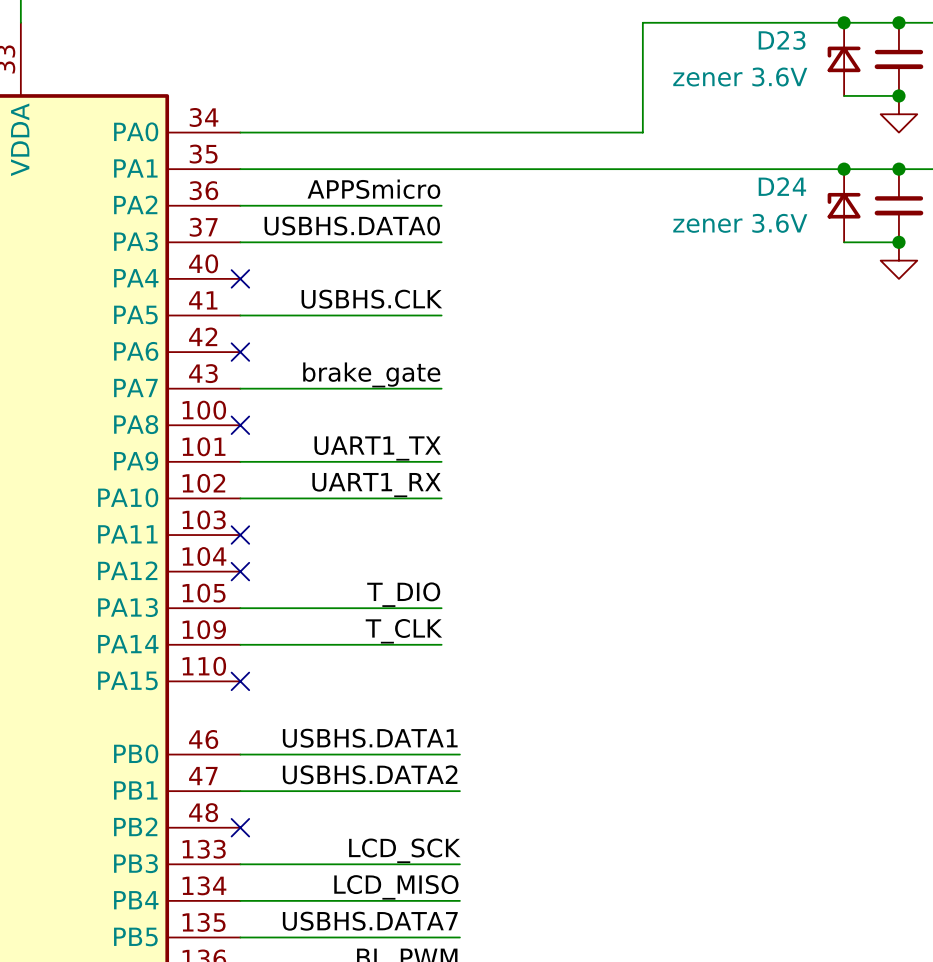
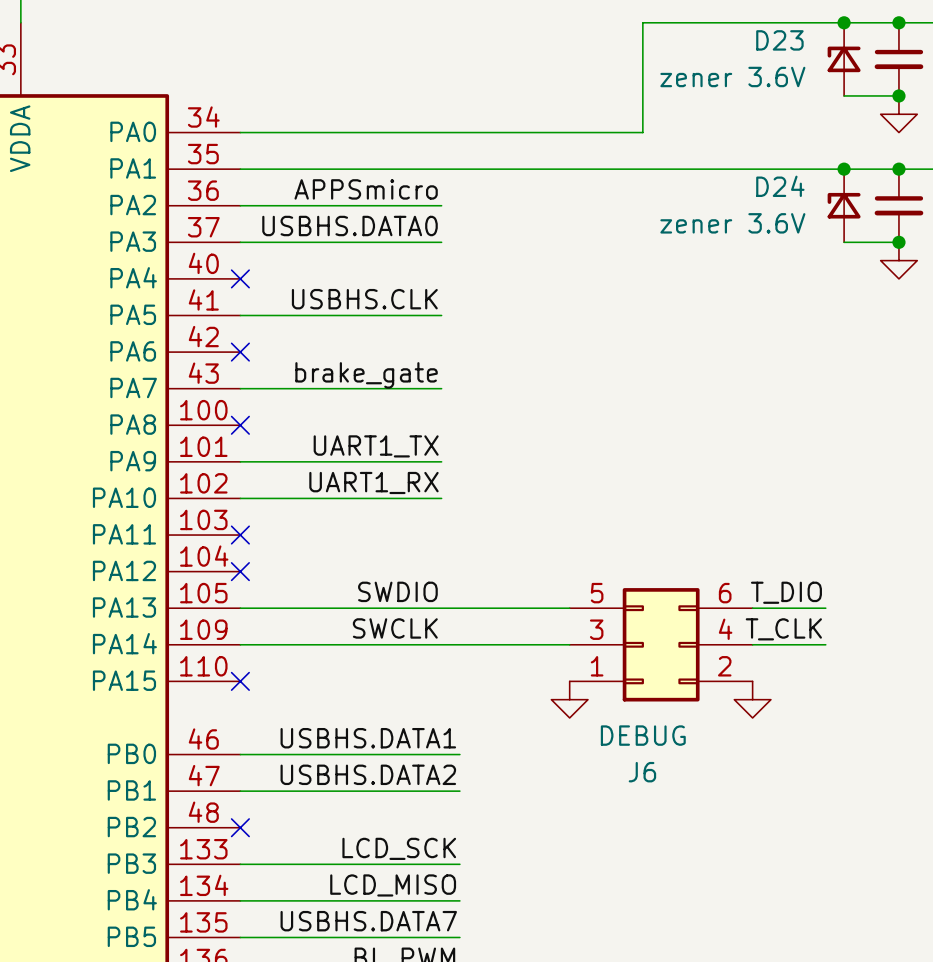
label: T_DIO (403, 594) -> SWDIO (397, 591)
label: none -> T_DIO (786, 592)
wire: none -> (441, 608) (569, 608)
wire: none -> (752, 608) (825, 608)
label: T_CLK (403, 631) -> SWCLK (395, 628)
label: none -> T_CLK (783, 629)
wire: none -> (441, 644) (569, 644)
J6: none -> DEBUG (661, 644)
wire: none -> (752, 644) (825, 644)
power symbol: none -> (569, 699)
power symbol: none -> (752, 699)

